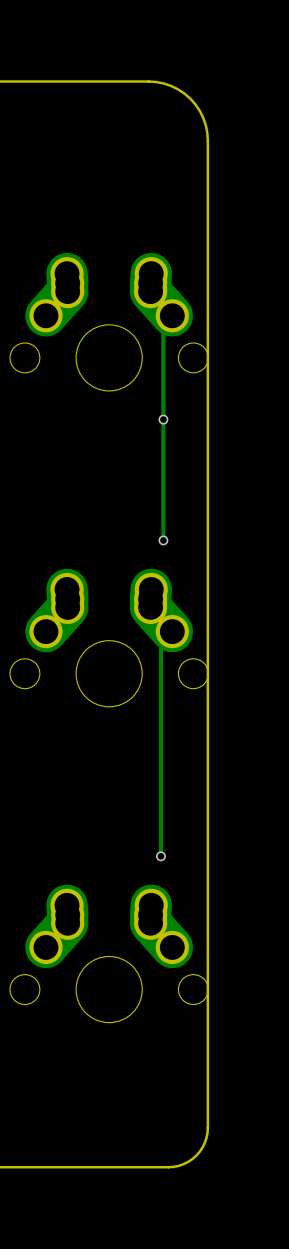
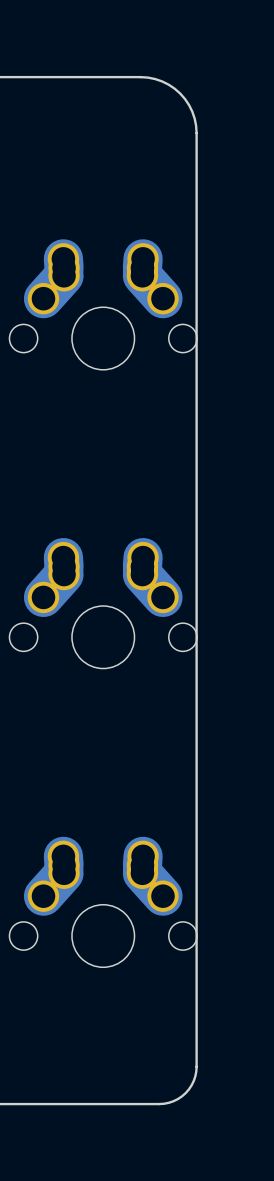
track: (172, 315) (172, 324) (163, 333) (163, 540) -> none
via: (163, 419) -> none
via: (163, 540) -> none
track: (172, 631) (172, 637) (160, 649) (160, 856) -> none
via: (160, 856) -> none

